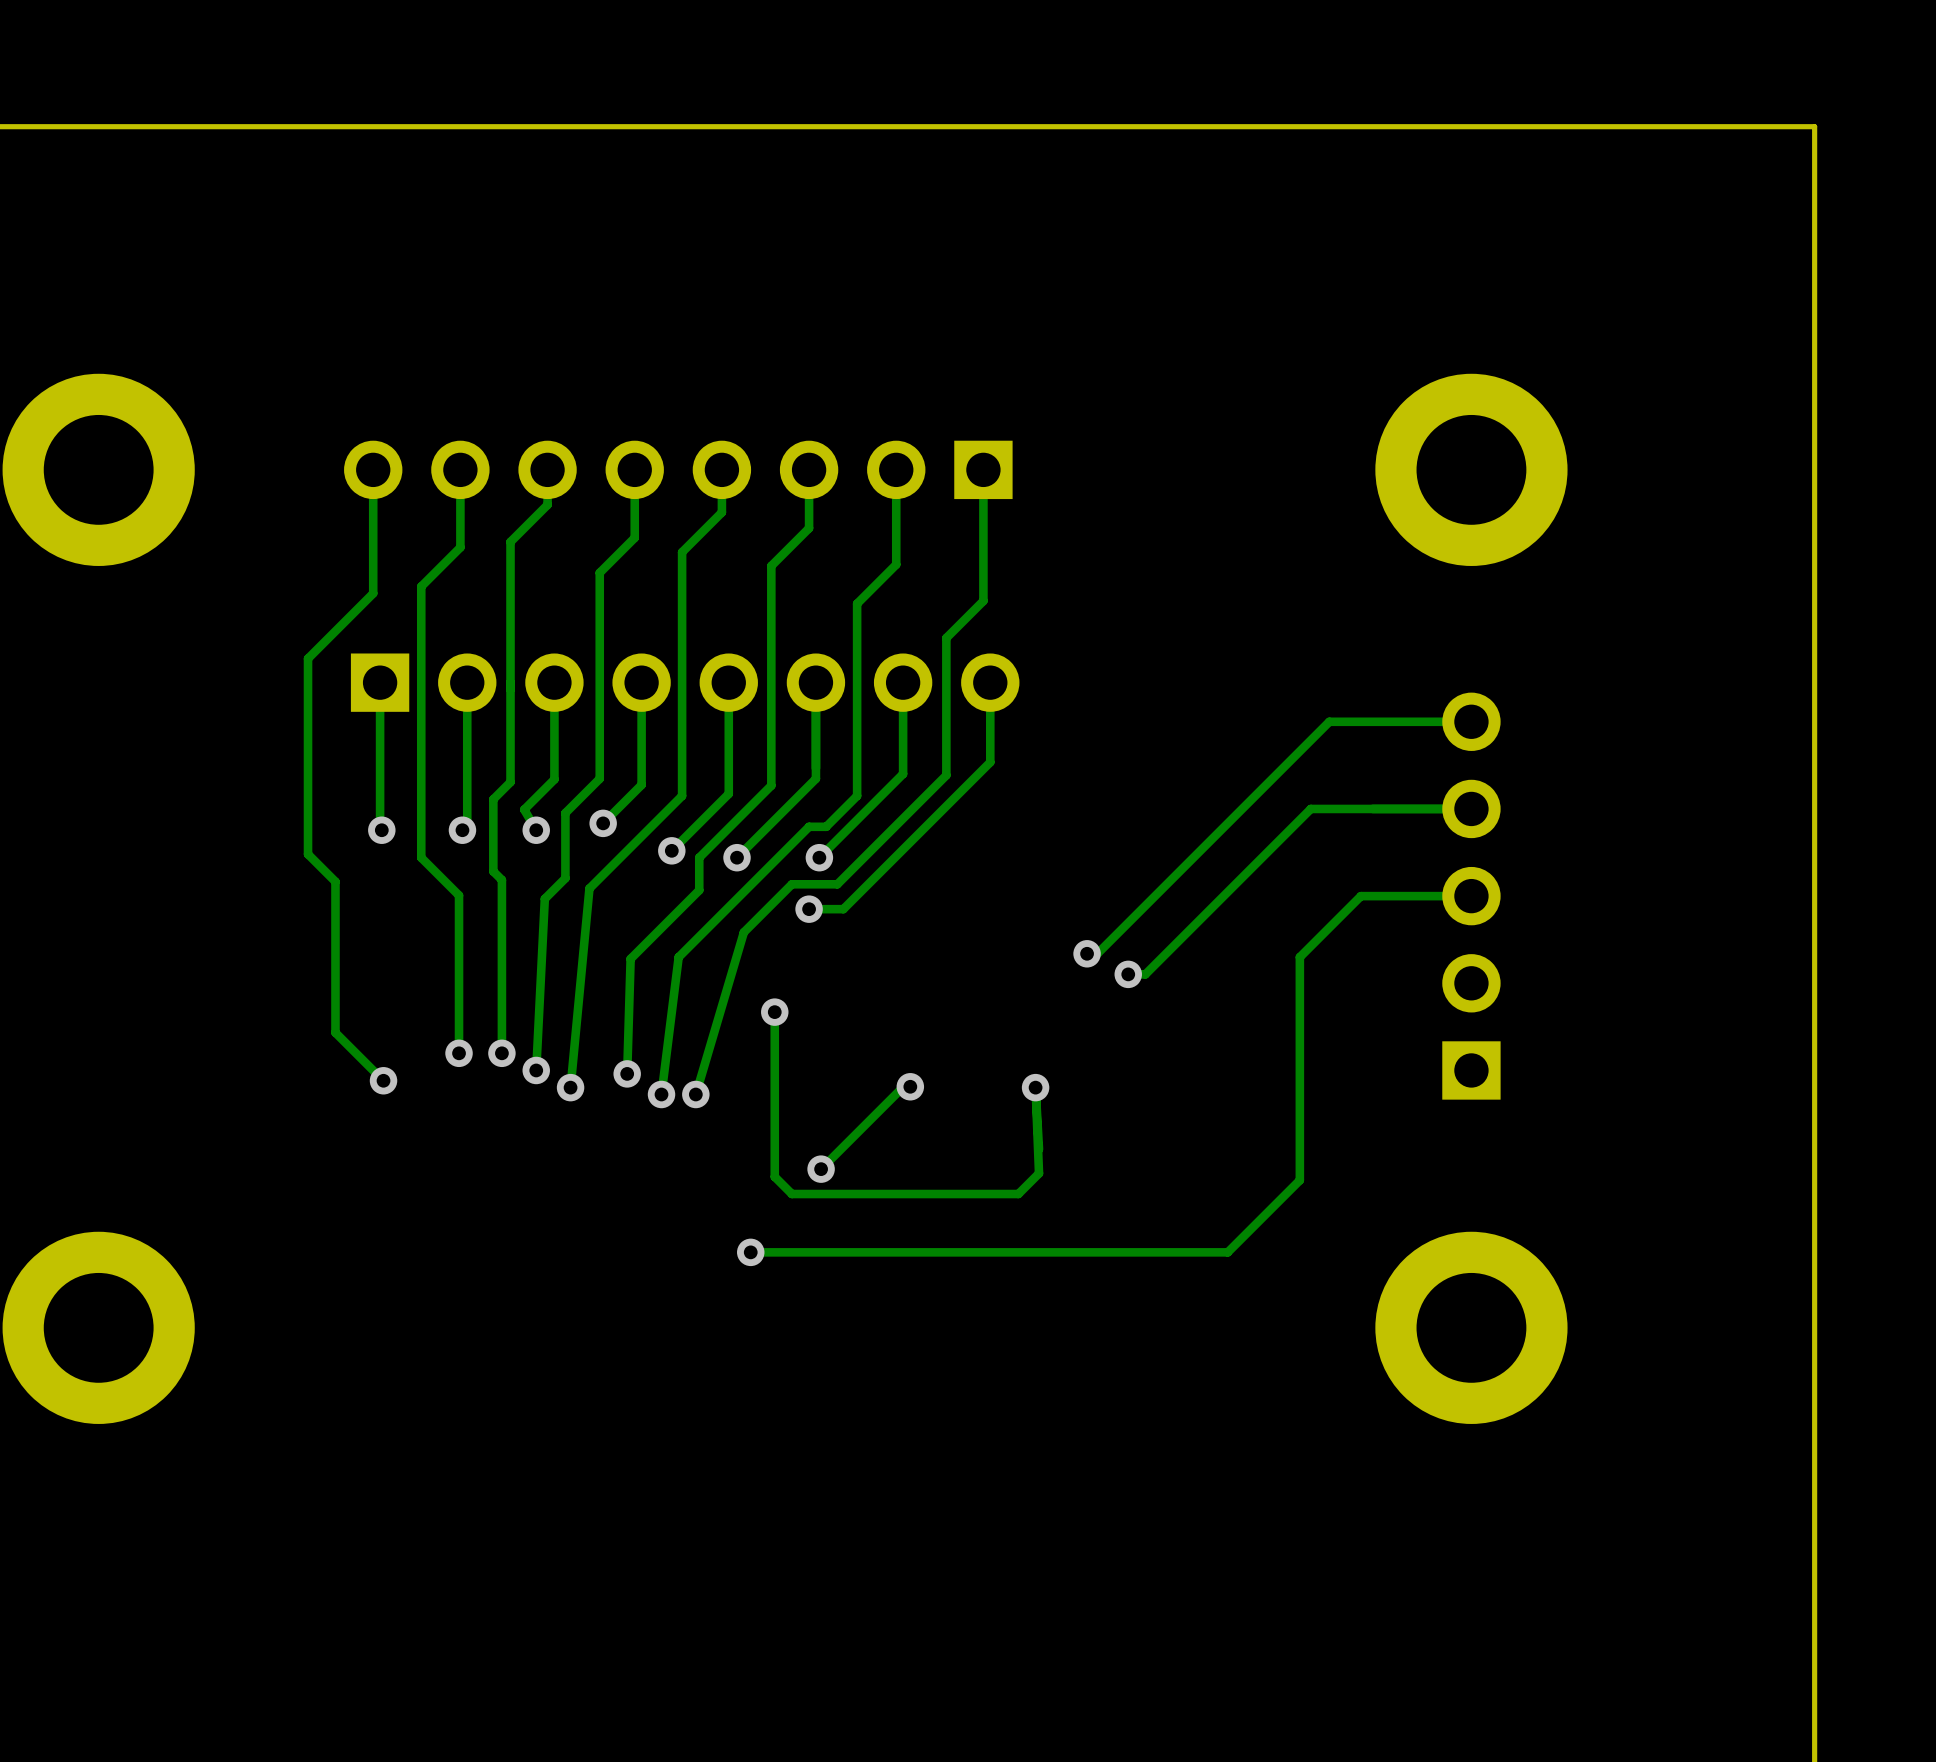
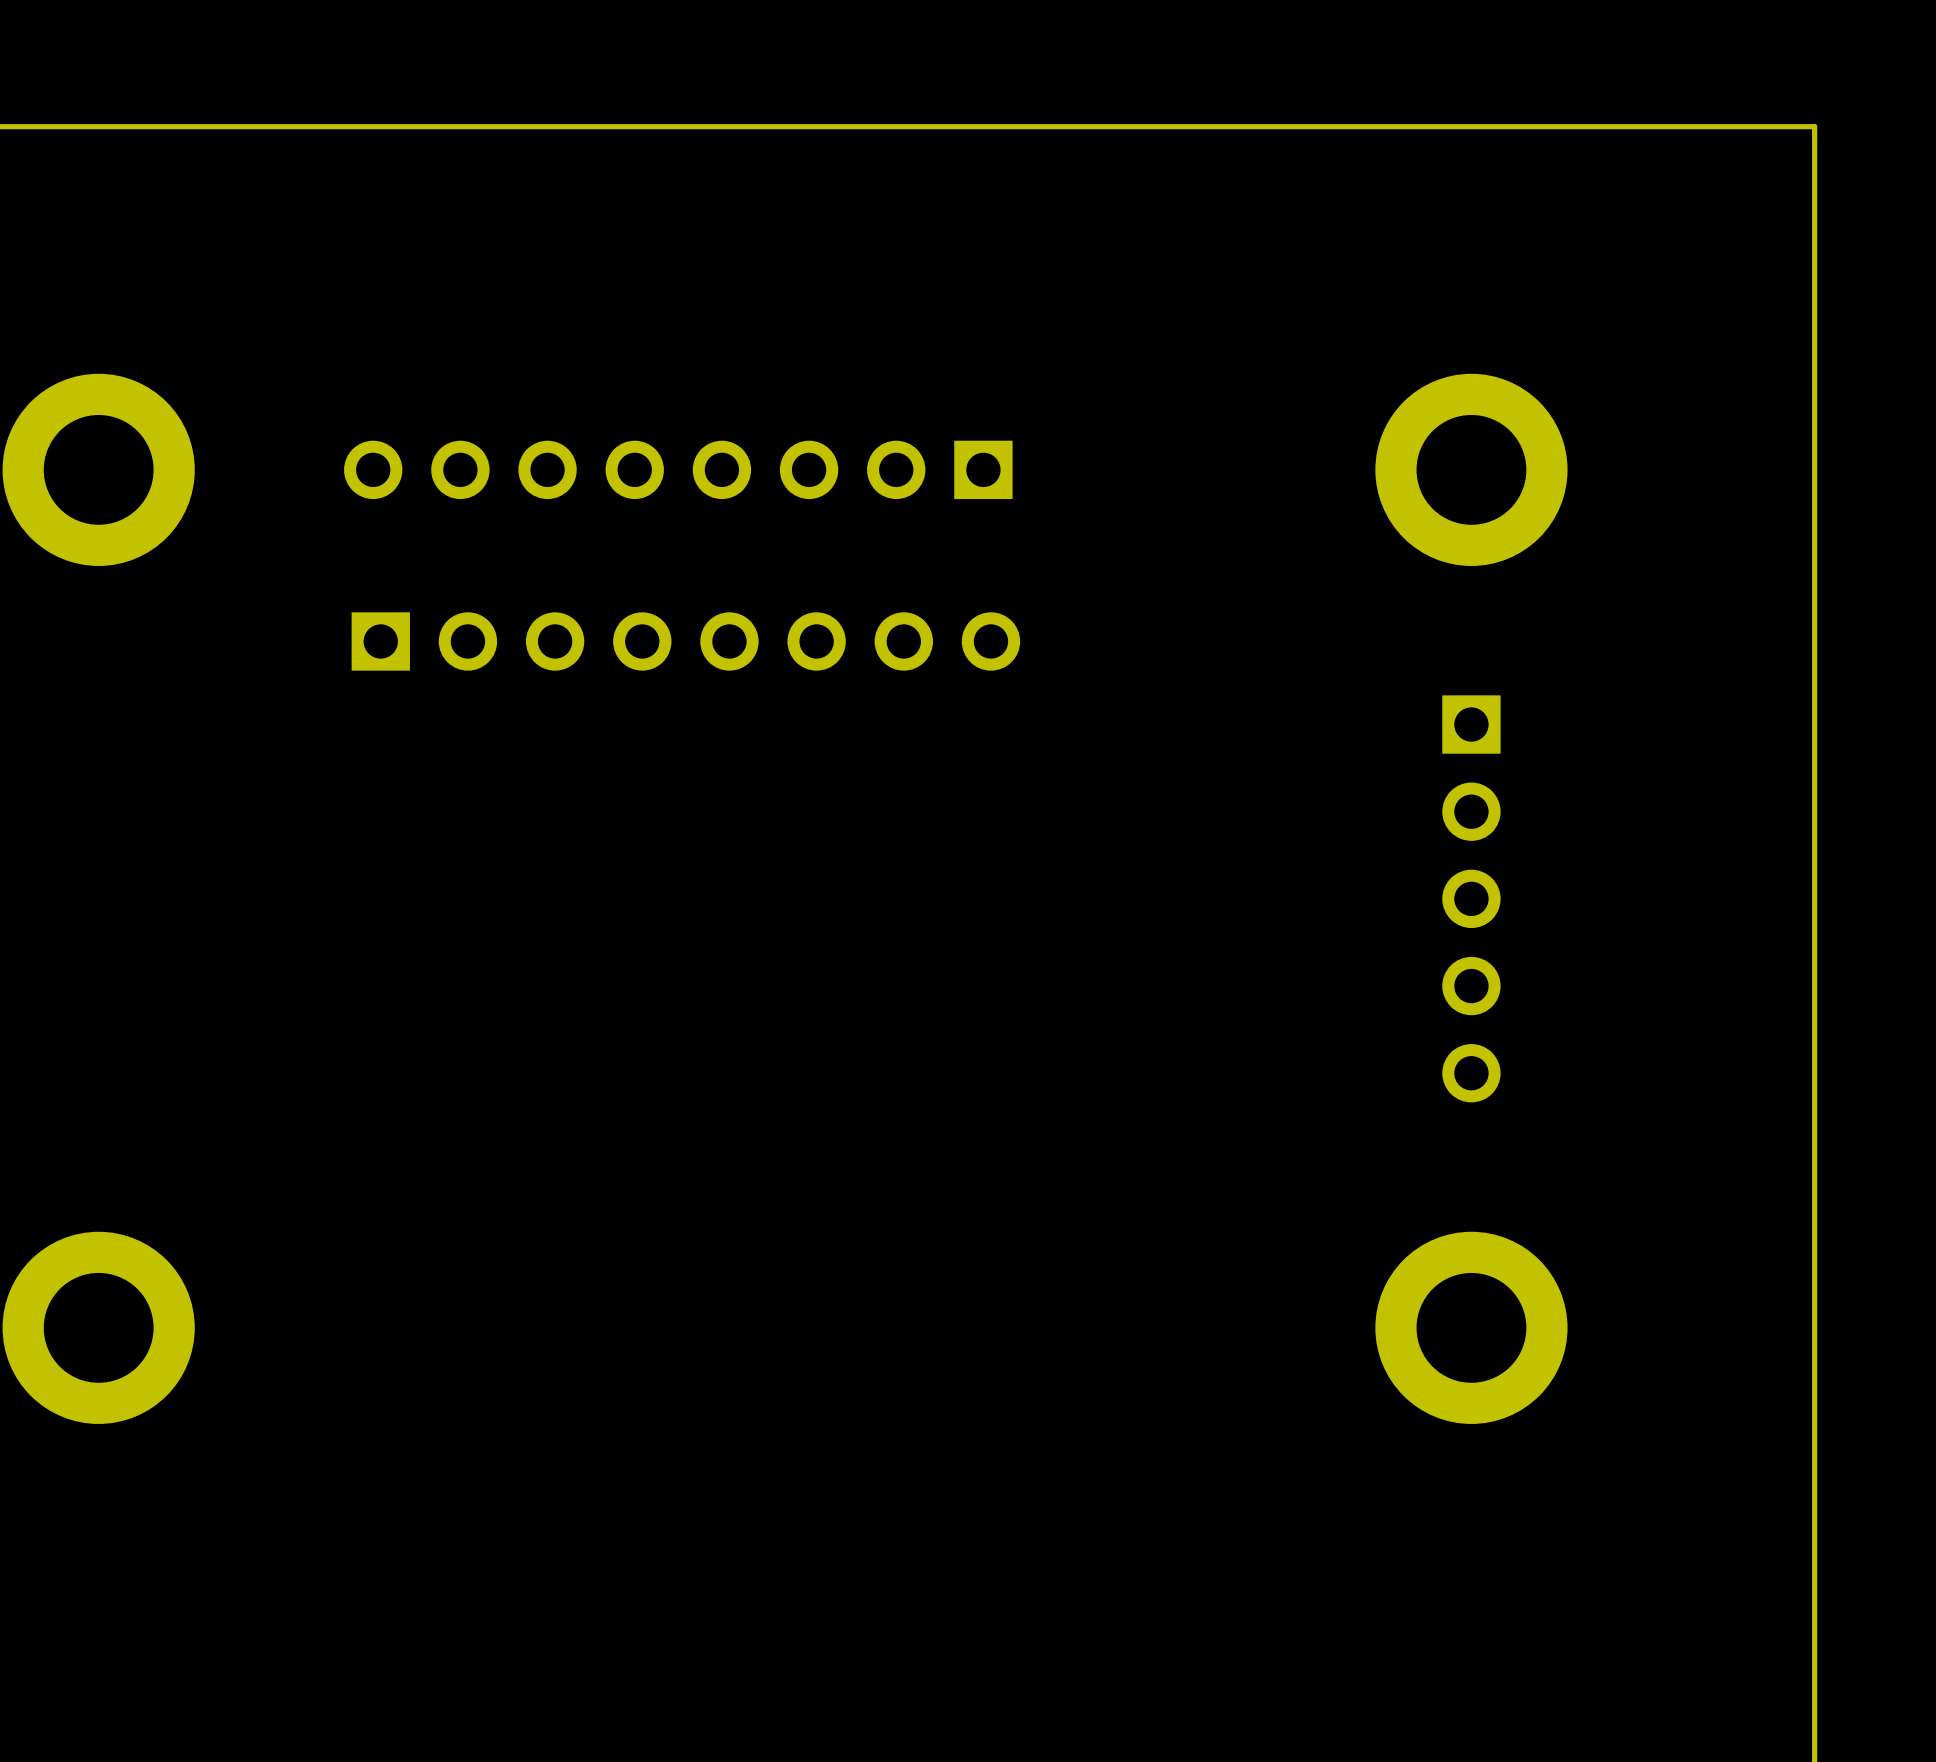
track: (373, 469) (373, 593) (308, 658) (308, 854) (335, 881) (335, 1032) (383, 1080) -> none
track: (460, 469) (460, 547) (421, 586) (421, 857) (459, 895) (459, 1053) -> none
track: (547, 469) (547, 504) (510, 541) (510, 782) (493, 799) (493, 871) (501, 880) (501, 1053) -> none
track: (634, 469) (634, 537) (599, 572) (599, 778) (565, 813) (565, 878) (544, 898) (536, 1070) -> none
track: (721, 469) (721, 512) (682, 552) (682, 795) (589, 888) (570, 1087) -> none
track: (809, 469) (809, 528) (771, 565) (771, 785) (699, 857) (699, 890) (630, 958) (627, 1073) -> none
track: (896, 469) (896, 564) (857, 603) (857, 795) (826, 826) (809, 826) (678, 957) (661, 1094) -> none
track: (983, 469) (983, 600) (946, 638) (946, 775) (837, 884) (791, 884) (743, 932) (695, 1094) -> none
track: (380, 682) (380, 828) (381, 830) -> none
track: (467, 682) (467, 825) (462, 830) -> none
track: (554, 682) (554, 779) (524, 809) (536, 830) -> none
track: (641, 682) (641, 784) (603, 823) -> none
part position: (685, 682) -> (685, 641)
track: (728, 682) (728, 793) (671, 850) -> none
track: (815, 682) (815, 778) (737, 857) -> none
track: (903, 682) (903, 773) (819, 857) -> none
track: (990, 682) (990, 762) (843, 909) (809, 909) -> none
track: (1471, 721) (1329, 721) (1097, 953) (1087, 953) -> none
track: (1471, 808) (1310, 808) (1145, 974) (1128, 974) -> none
via: (603, 823) -> none
via: (381, 830) -> none
via: (462, 830) -> none
via: (536, 830) -> none
via: (671, 850) -> none
via: (737, 857) -> none
via: (819, 857) -> none
track: (1471, 896) (1360, 896) (1299, 957) (1299, 1180) (1227, 1252) (750, 1252) -> none
part rotation: 0° (1471, 896) -> 180° (1471, 898)
via: (809, 909) -> none
via: (1087, 953) -> none
via: (1128, 974) -> none
track: (774, 1012) (774, 1176) (791, 1194) (1018, 1194) (1039, 1173) (1035, 1087) (1039, 1149) -> none
via: (774, 1012) -> none
via: (459, 1053) -> none
via: (501, 1053) -> none
via: (536, 1070) -> none
via: (627, 1073) -> none
via: (383, 1080) -> none
track: (910, 1086) (903, 1086) (821, 1169) -> none
via: (910, 1086) -> none
via: (570, 1087) -> none
via: (1035, 1087) -> none
via: (661, 1094) -> none
via: (695, 1094) -> none
via: (821, 1169) -> none
via: (750, 1252) -> none

